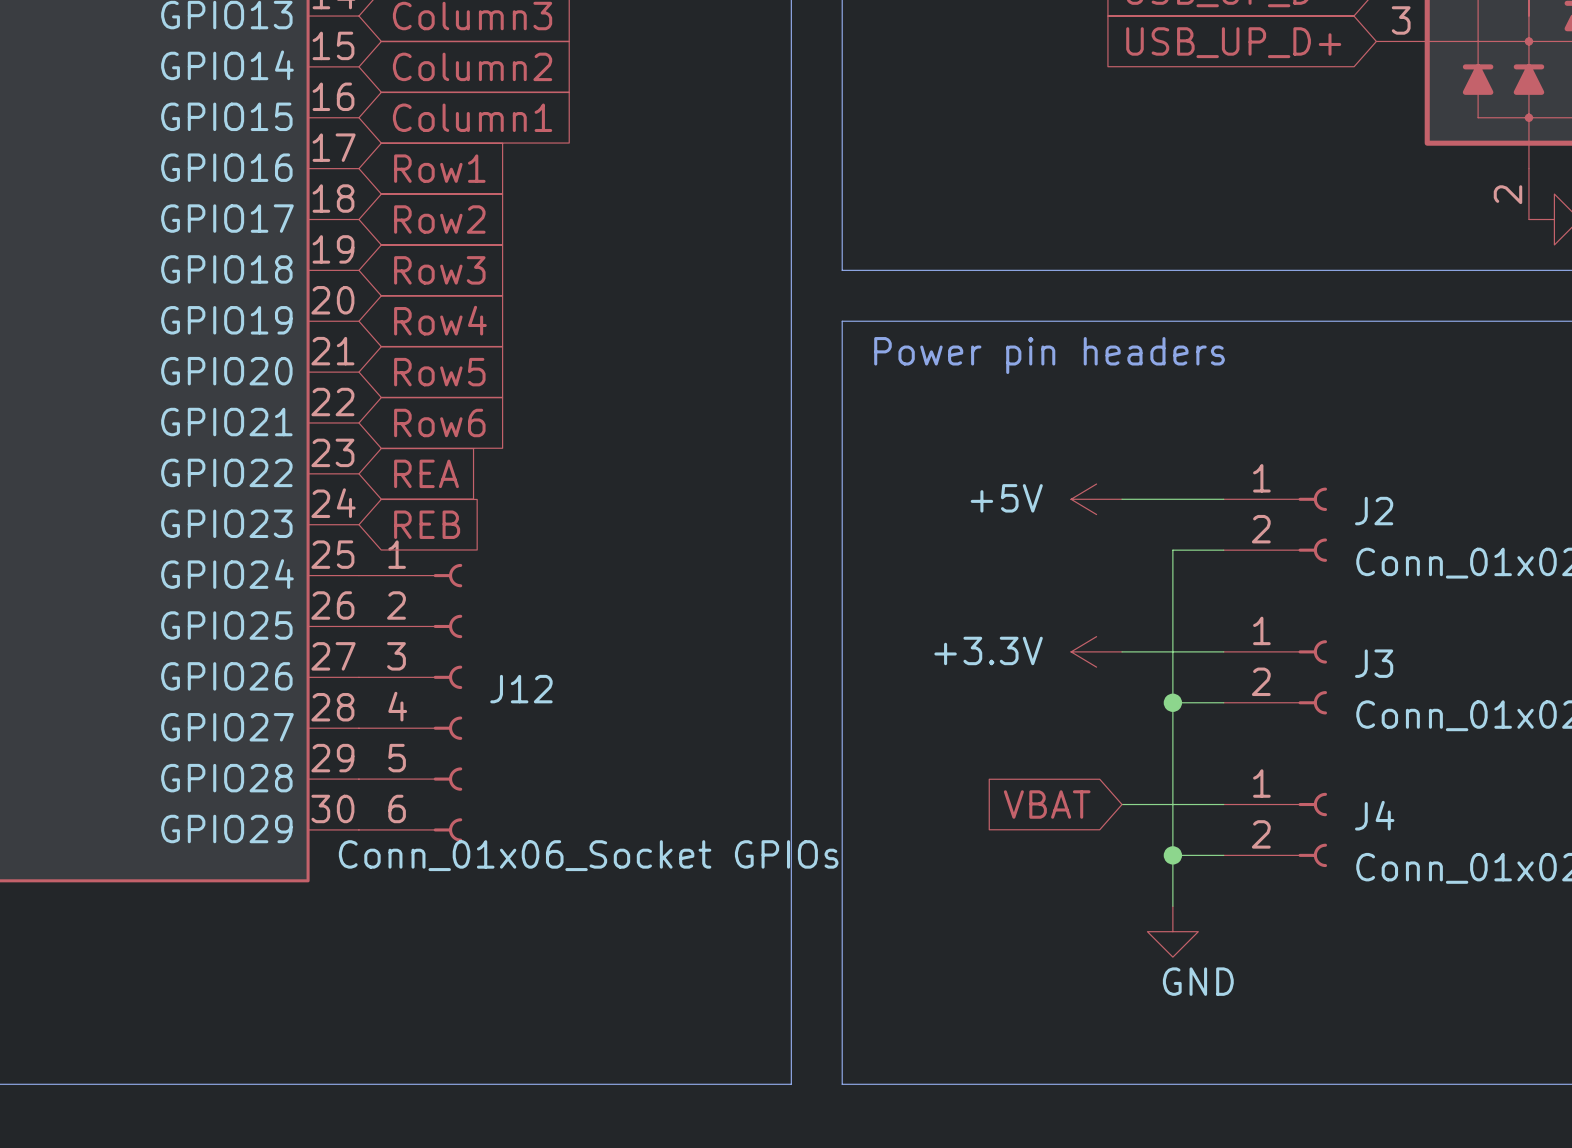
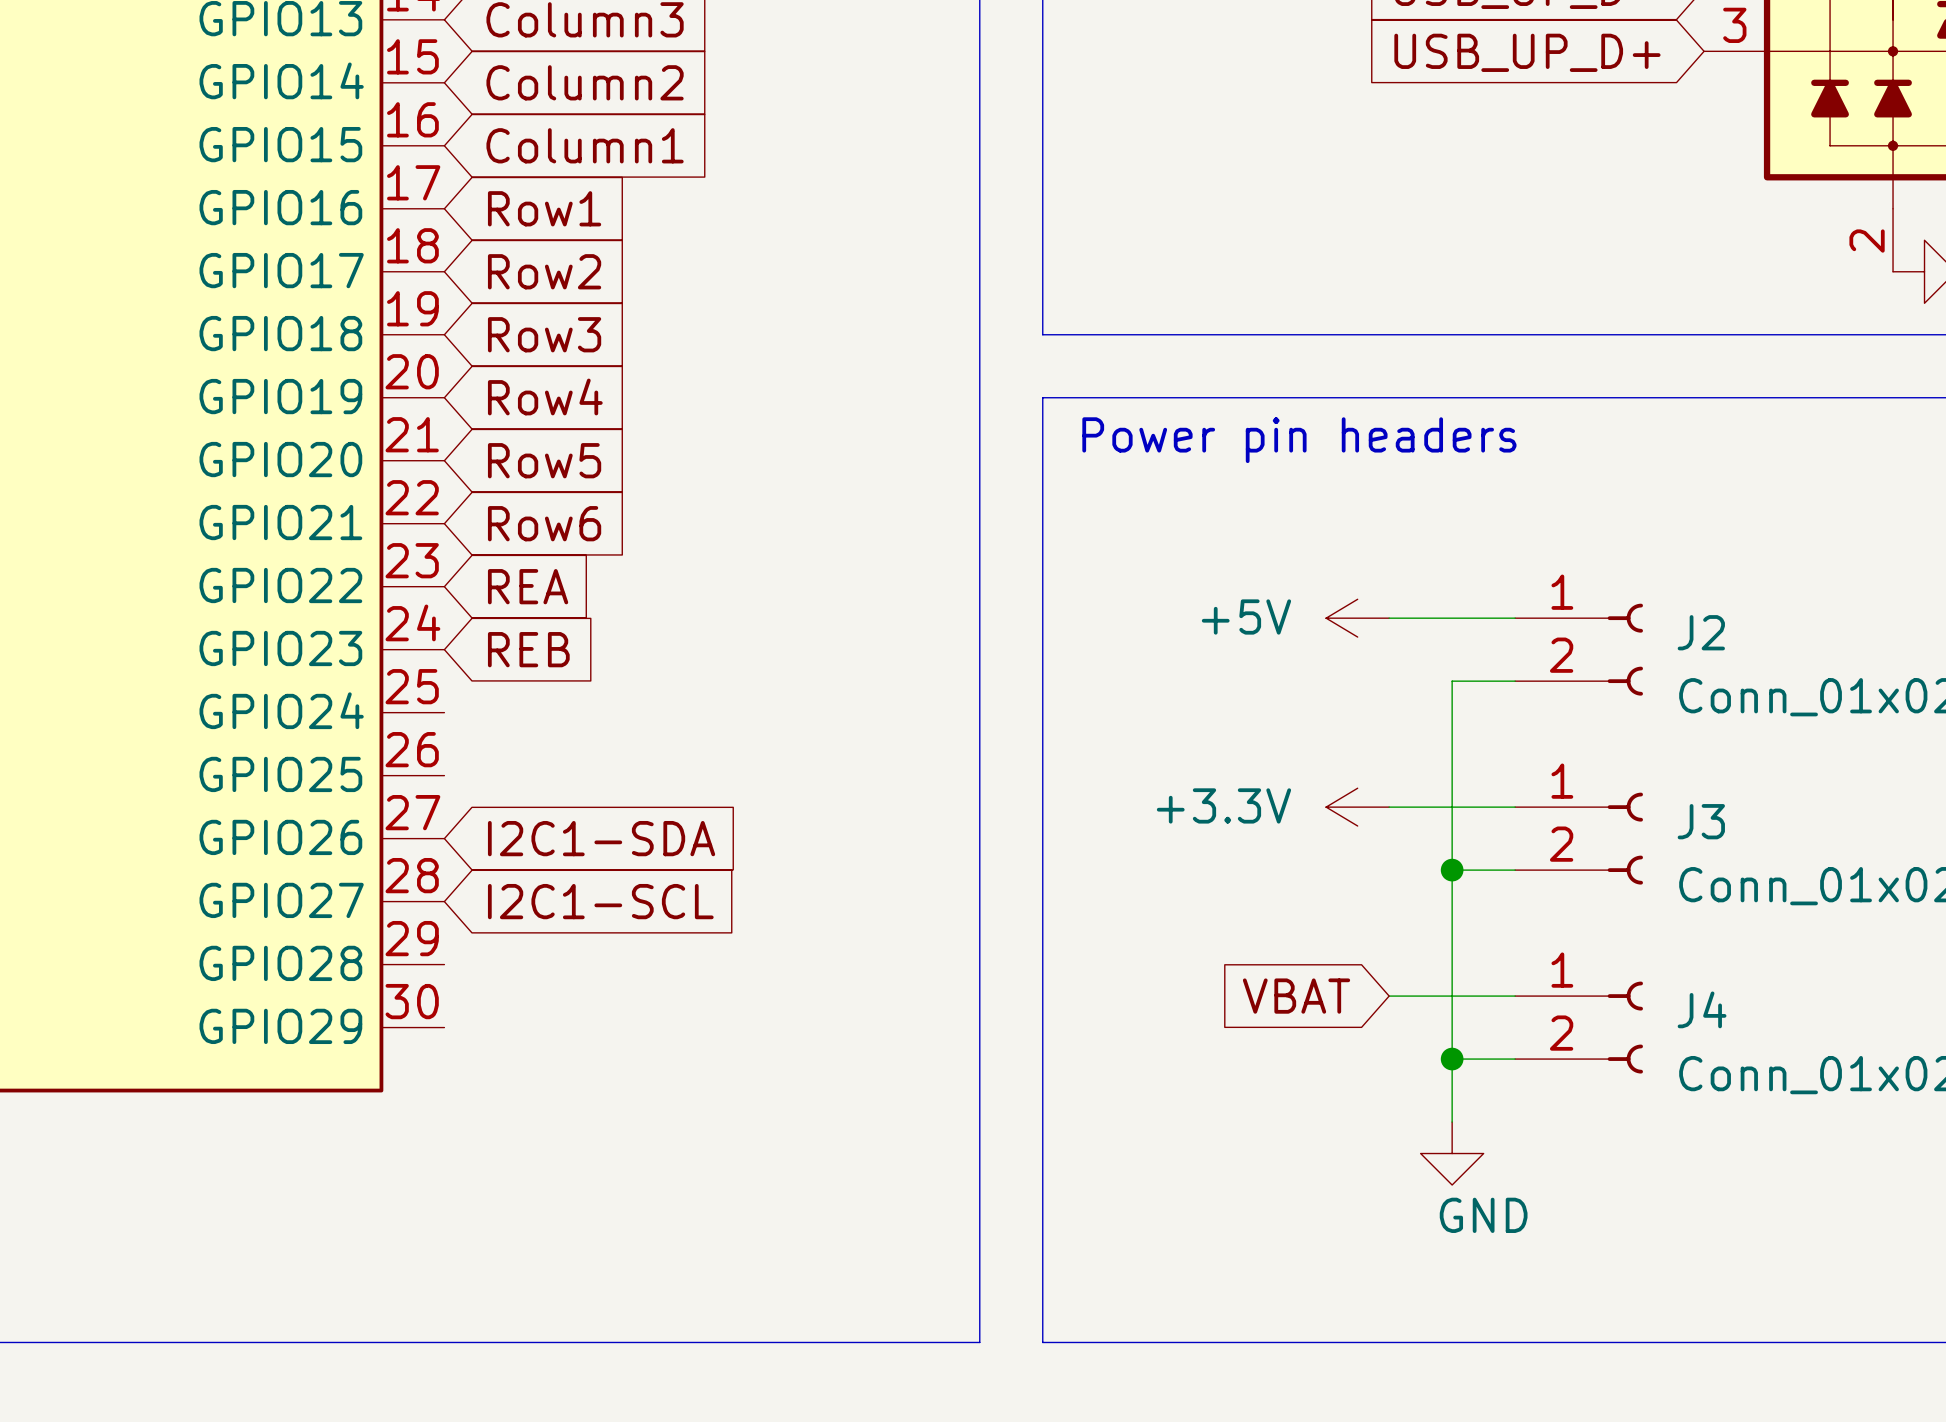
global label: none -> I2C1-SDA (601, 838)
J12: Conn_01x06_Socket GPIOs (410, 702) -> none
global label: none -> I2C1-SCL (600, 901)

